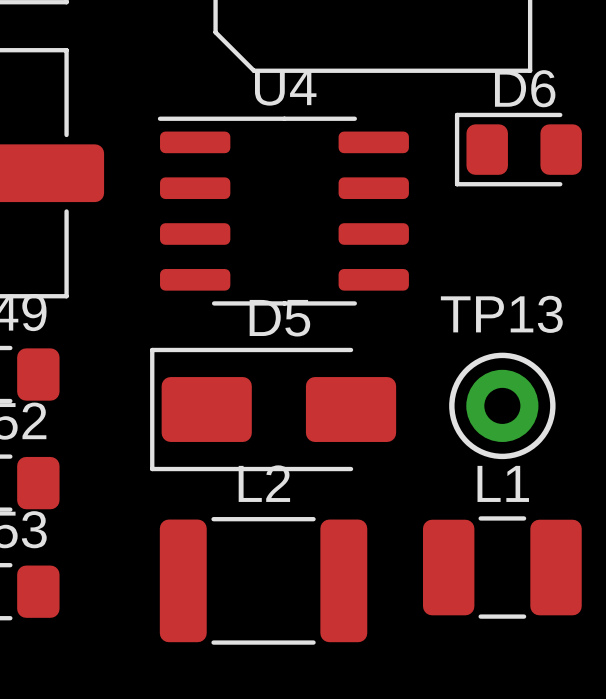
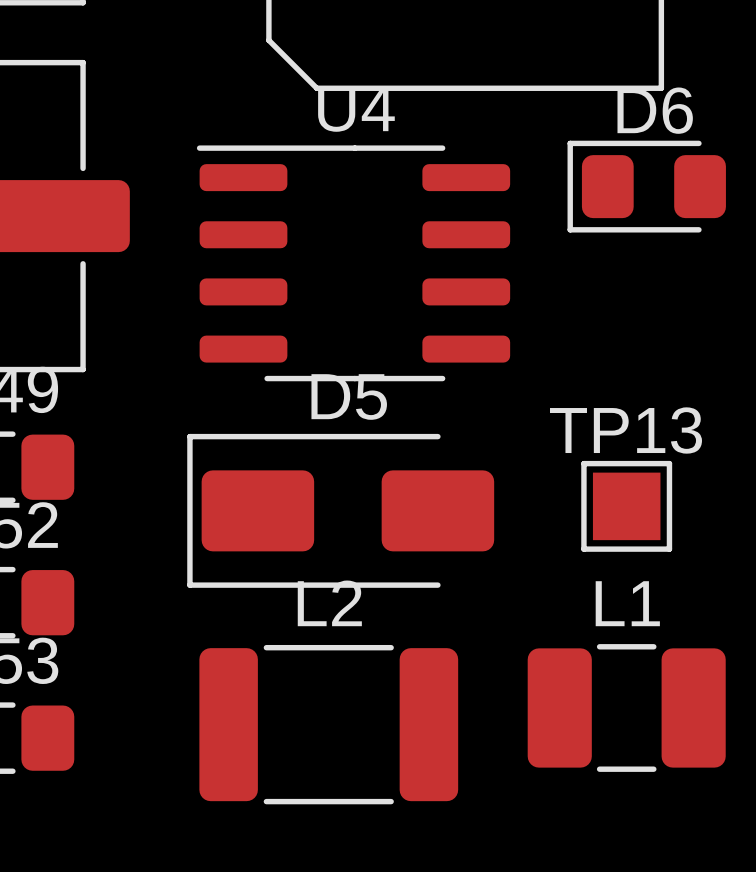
TP13 footprint: [449, 352, 556, 460] -> [581, 460, 673, 552]

